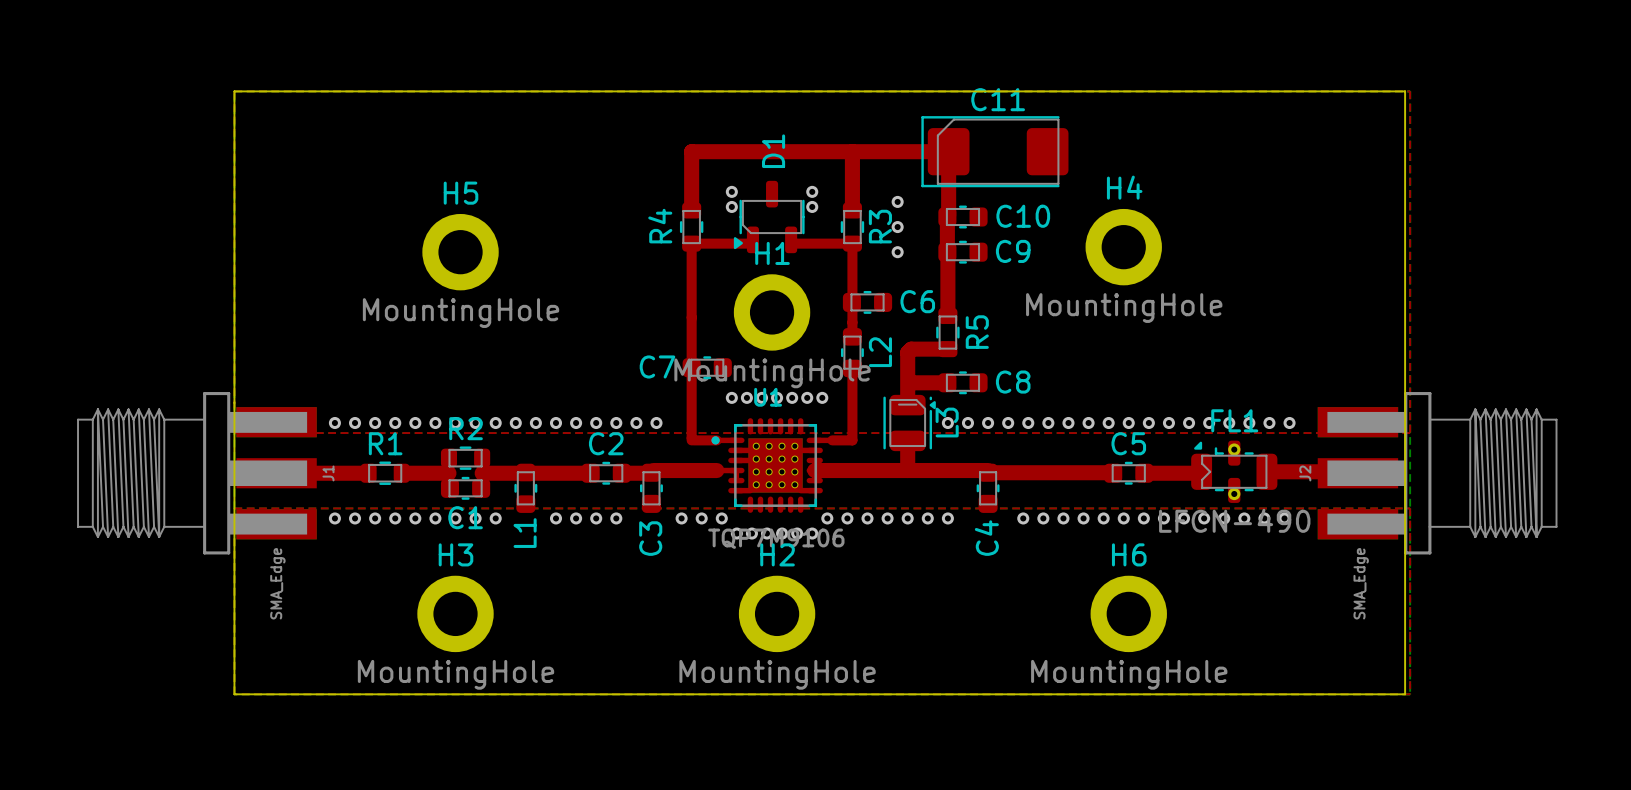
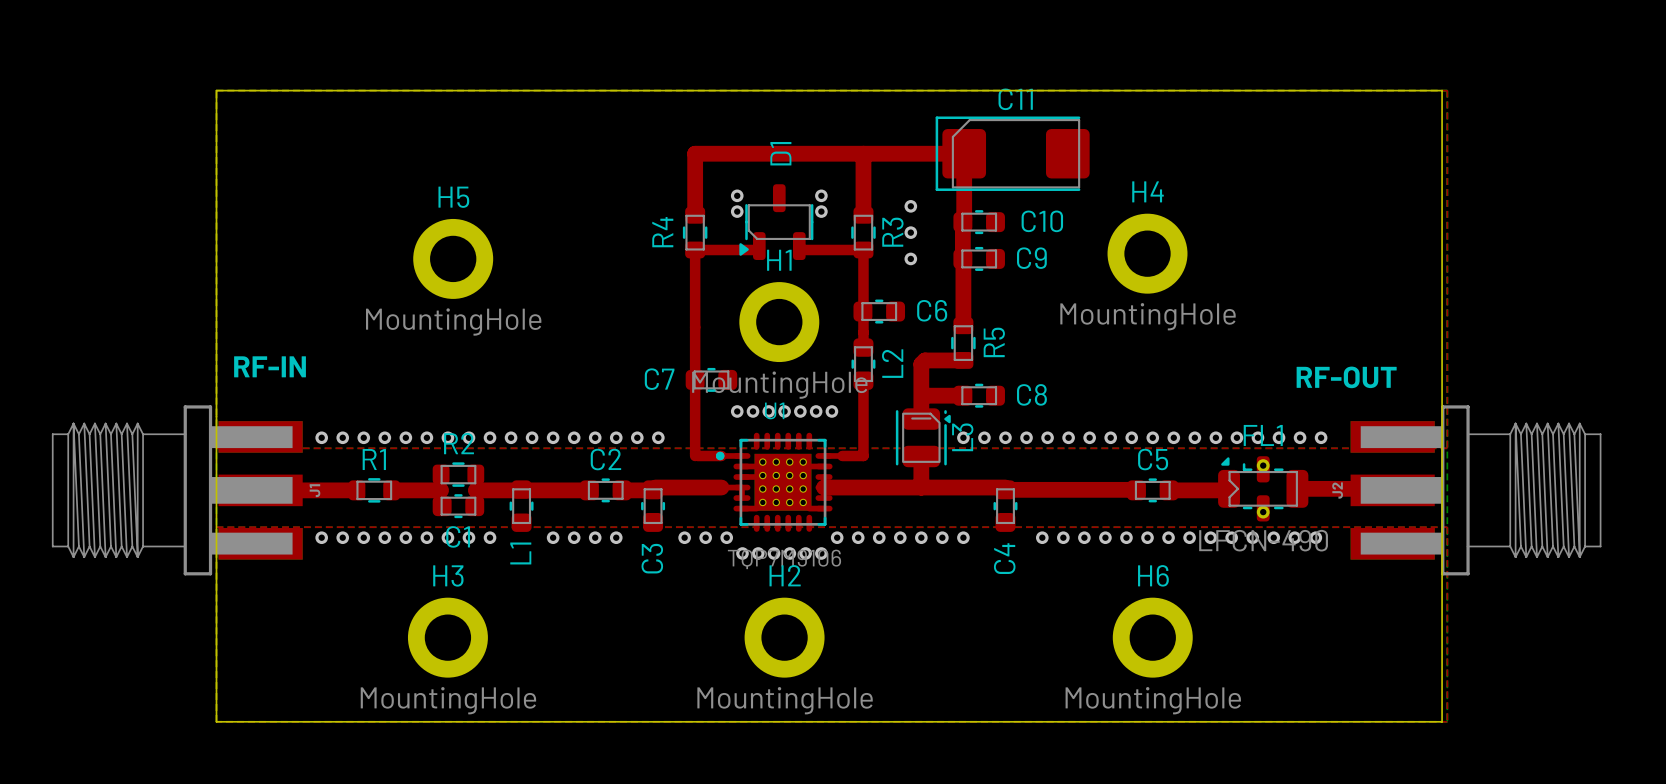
text: none -> RF-IN (270, 366)
text: none -> RF-OUT (1346, 377)
J1 value: SMA_Edge (277, 583) -> none
J2 value: SMA_Edge (1361, 583) -> none

